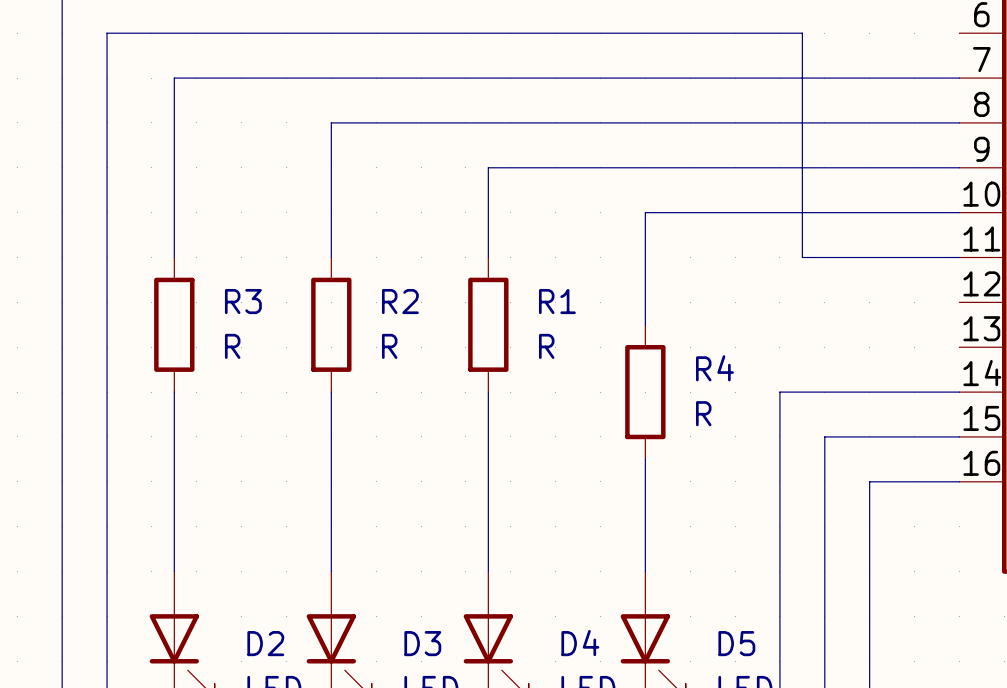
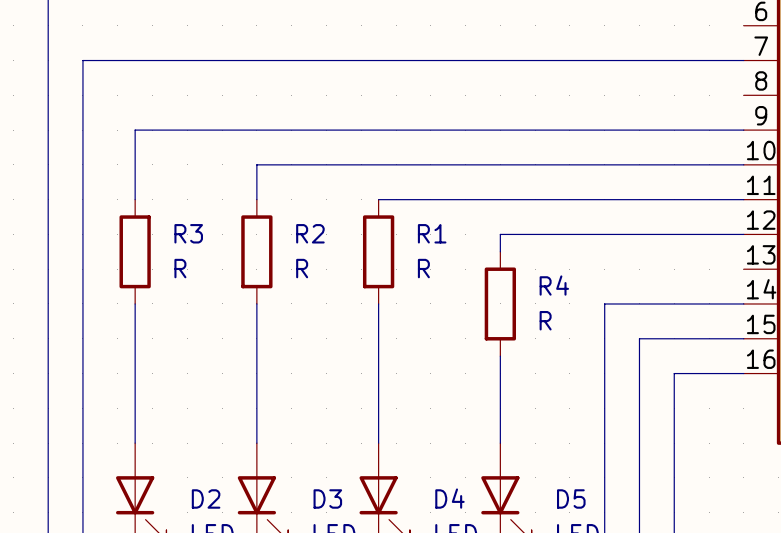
wire: (107, 78) (107, 33) (802, 33) (802, 257) -> (378, 199) (622, 199)
wire: (174, 78) (174, 167) -> (135, 60) (82, 60)
wire: (959, 122) (331, 122) (331, 212) -> none
wire: (488, 167) (488, 257) -> (378, 130) (135, 130)
wire: (645, 212) (645, 302) -> (500, 164) (256, 164)
wire: none -> (500, 234) (743, 234)

